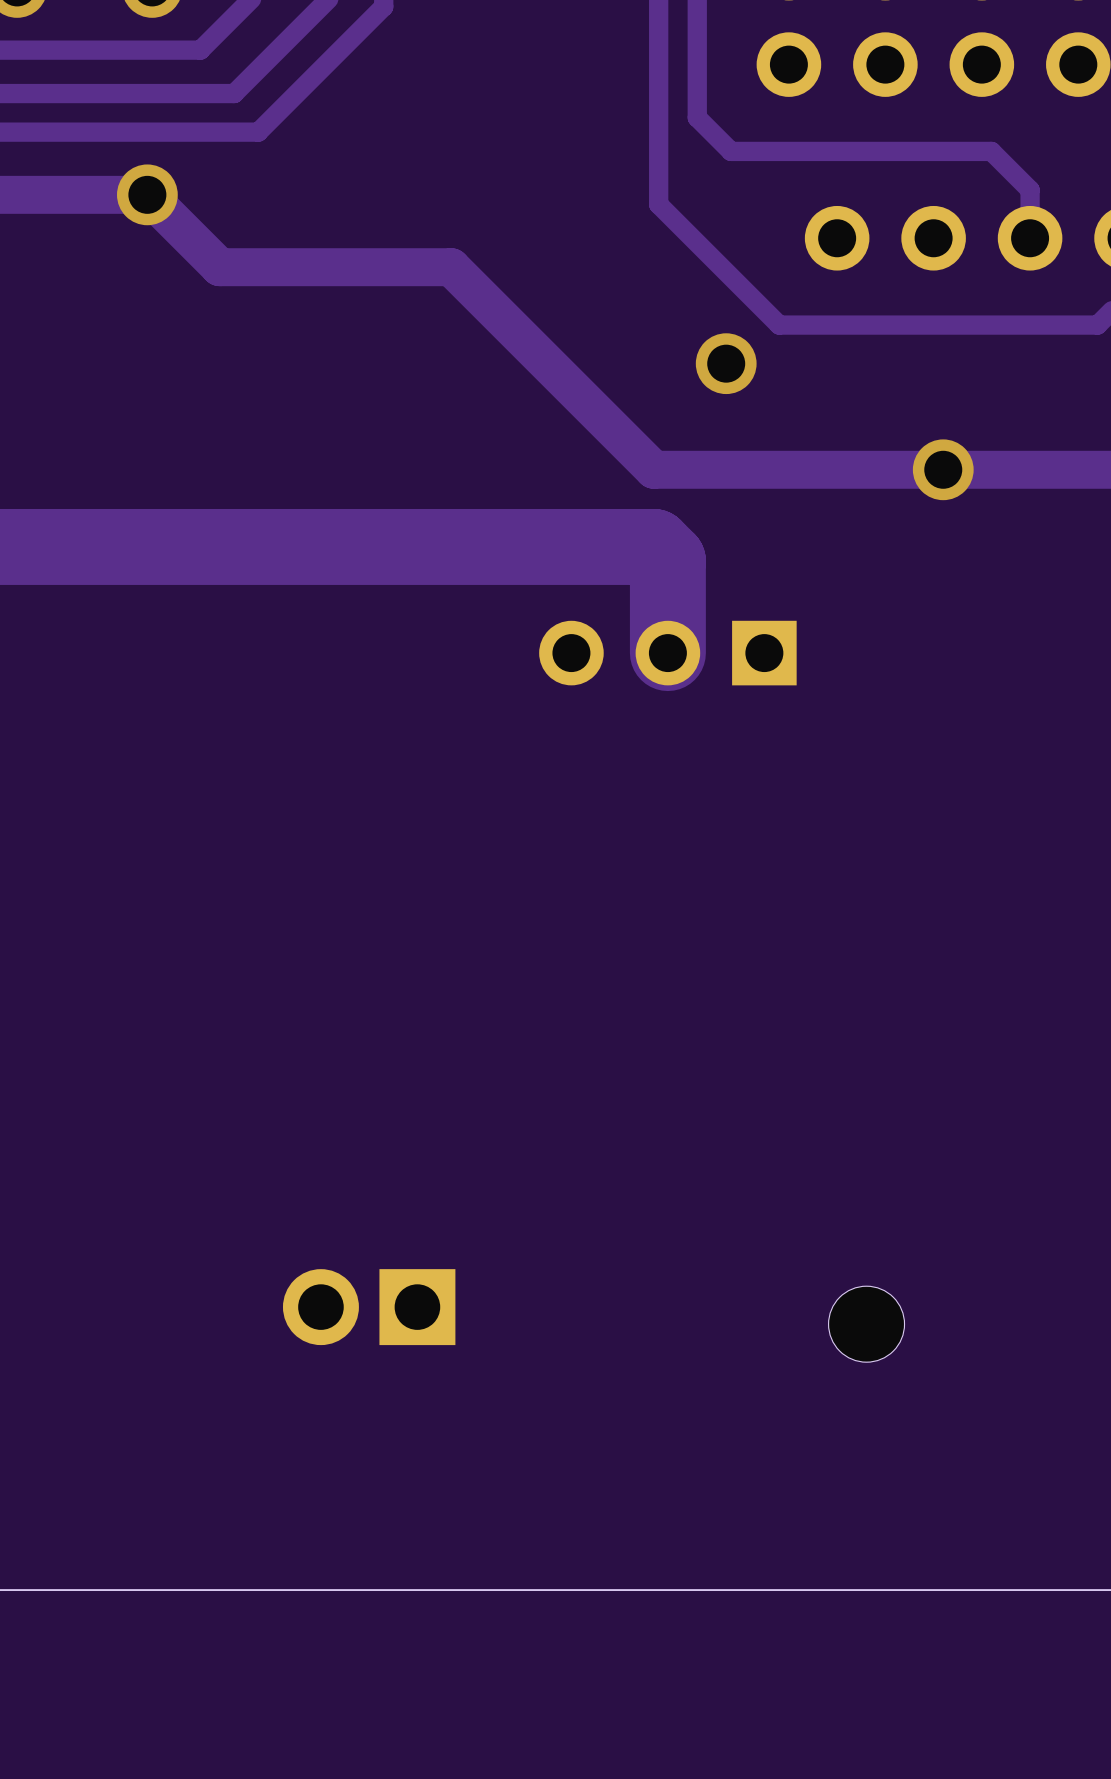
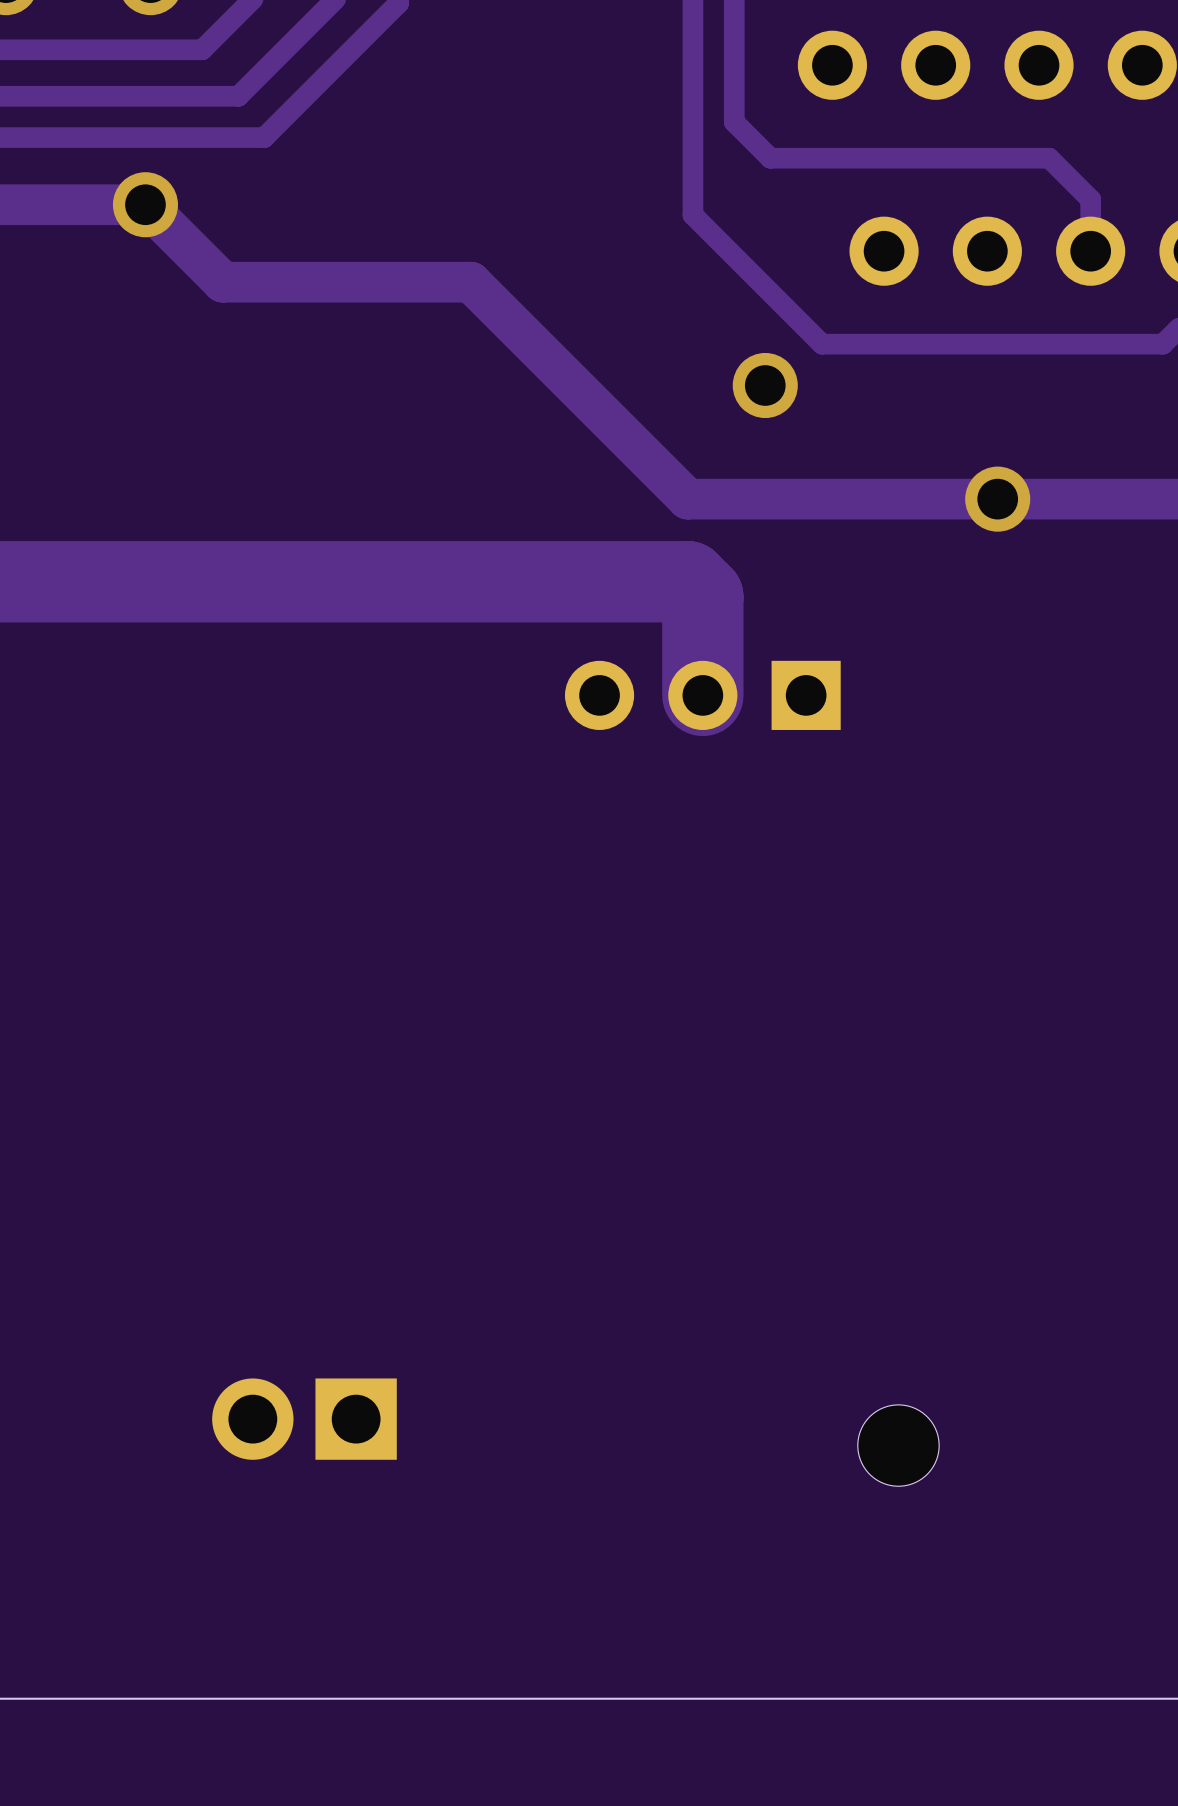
part position: (369, 1307) -> (304, 1419)
part position: (866, 1324) -> (898, 1445)

